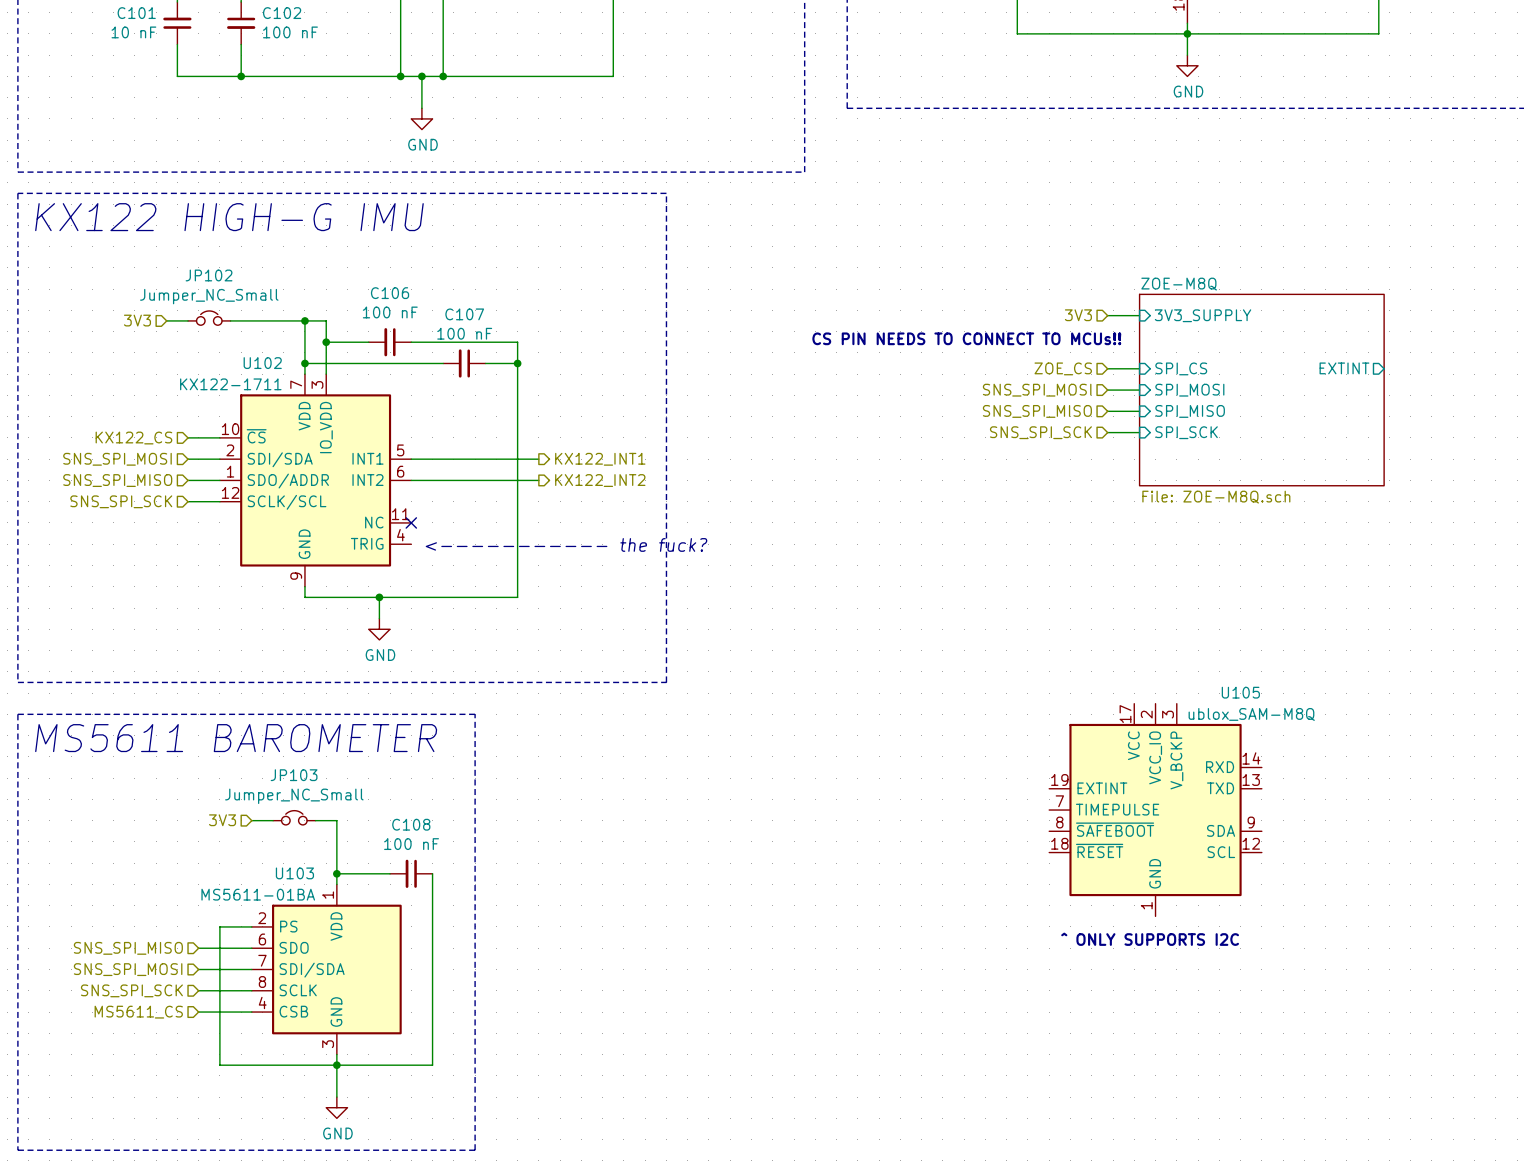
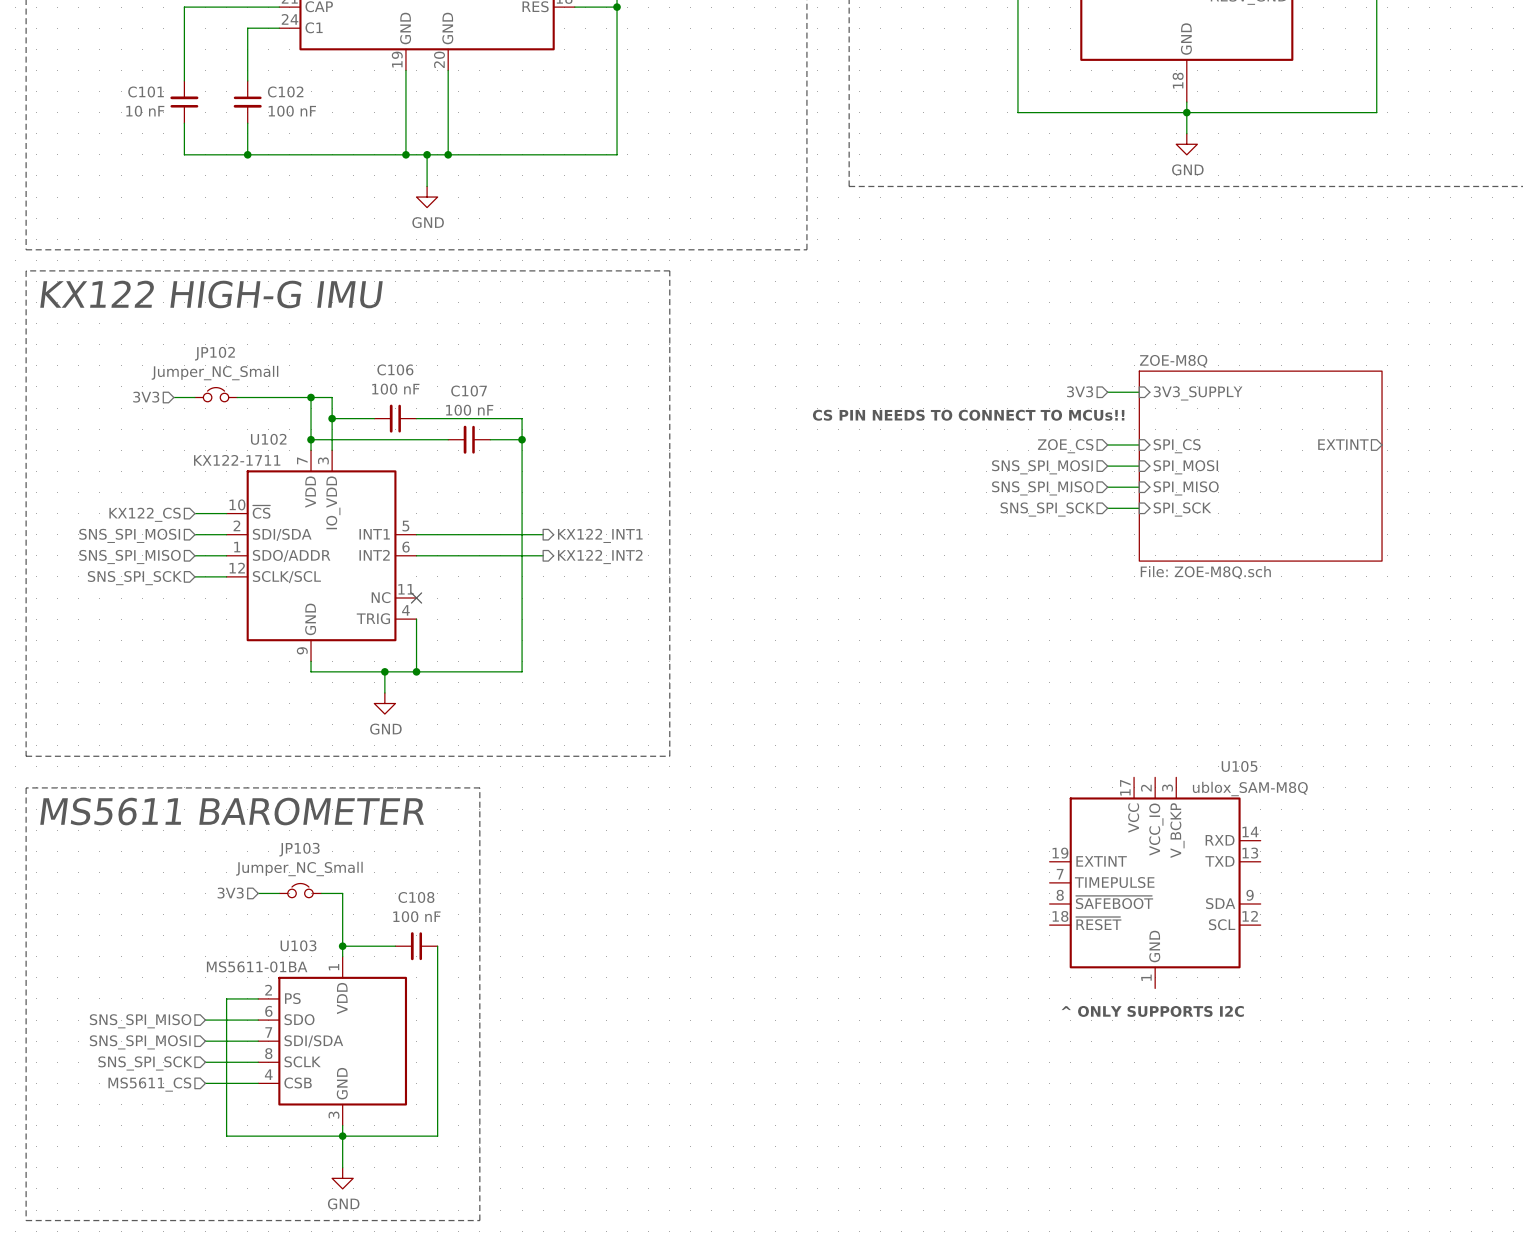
wire: none -> (416, 619) (416, 671)
text: <----------- the fuck? (566, 544) -> none
junction: none -> (416, 671)

